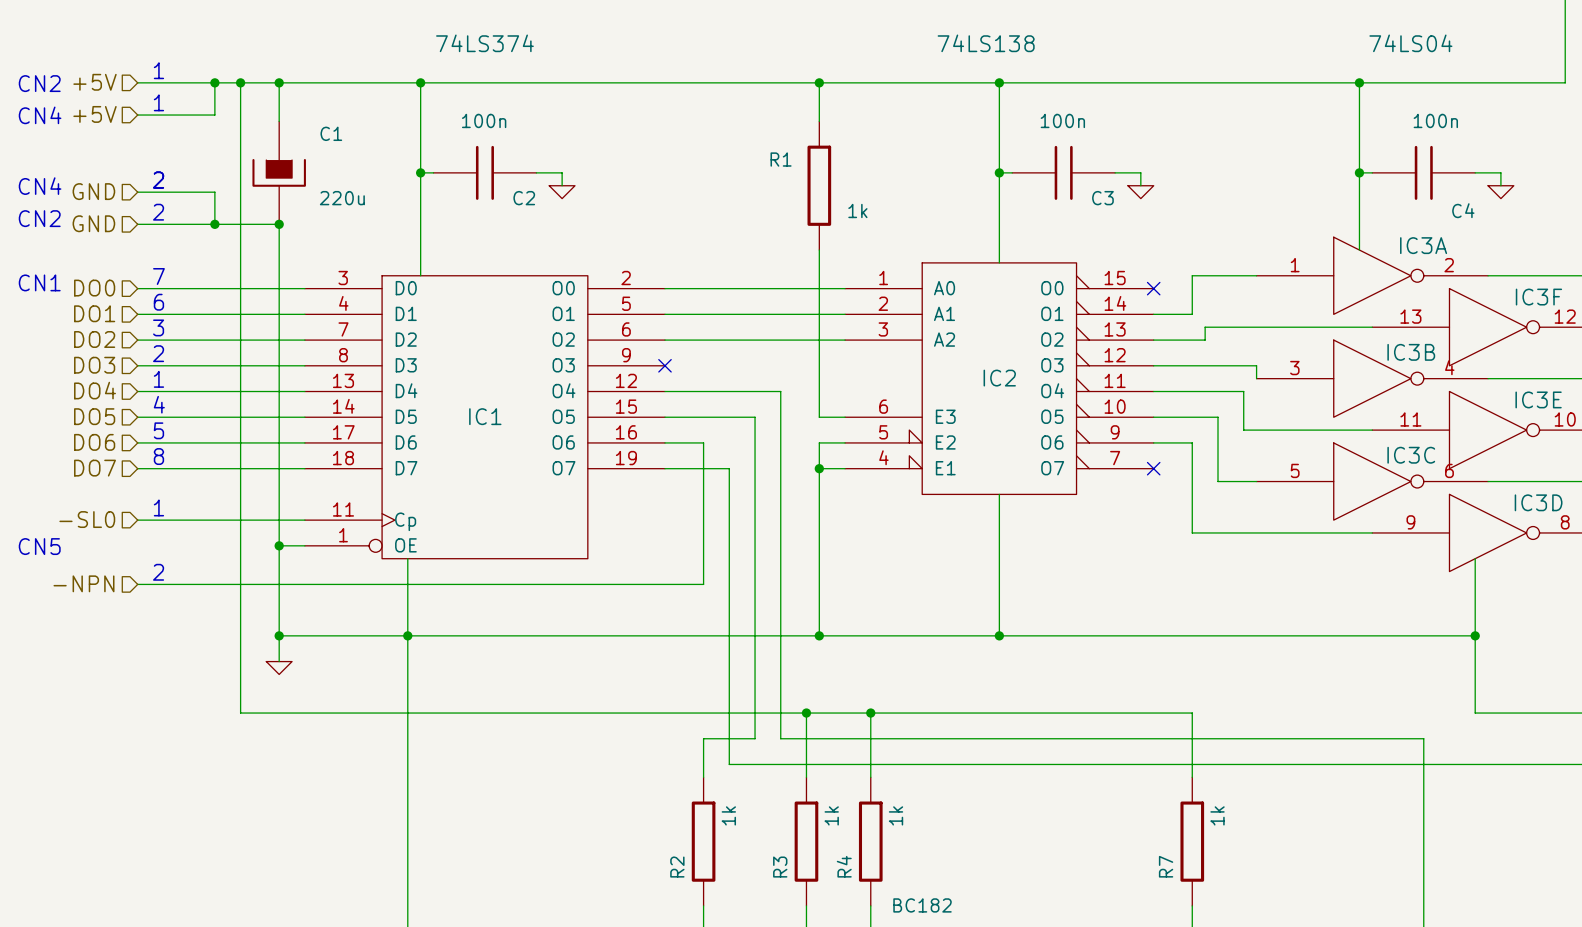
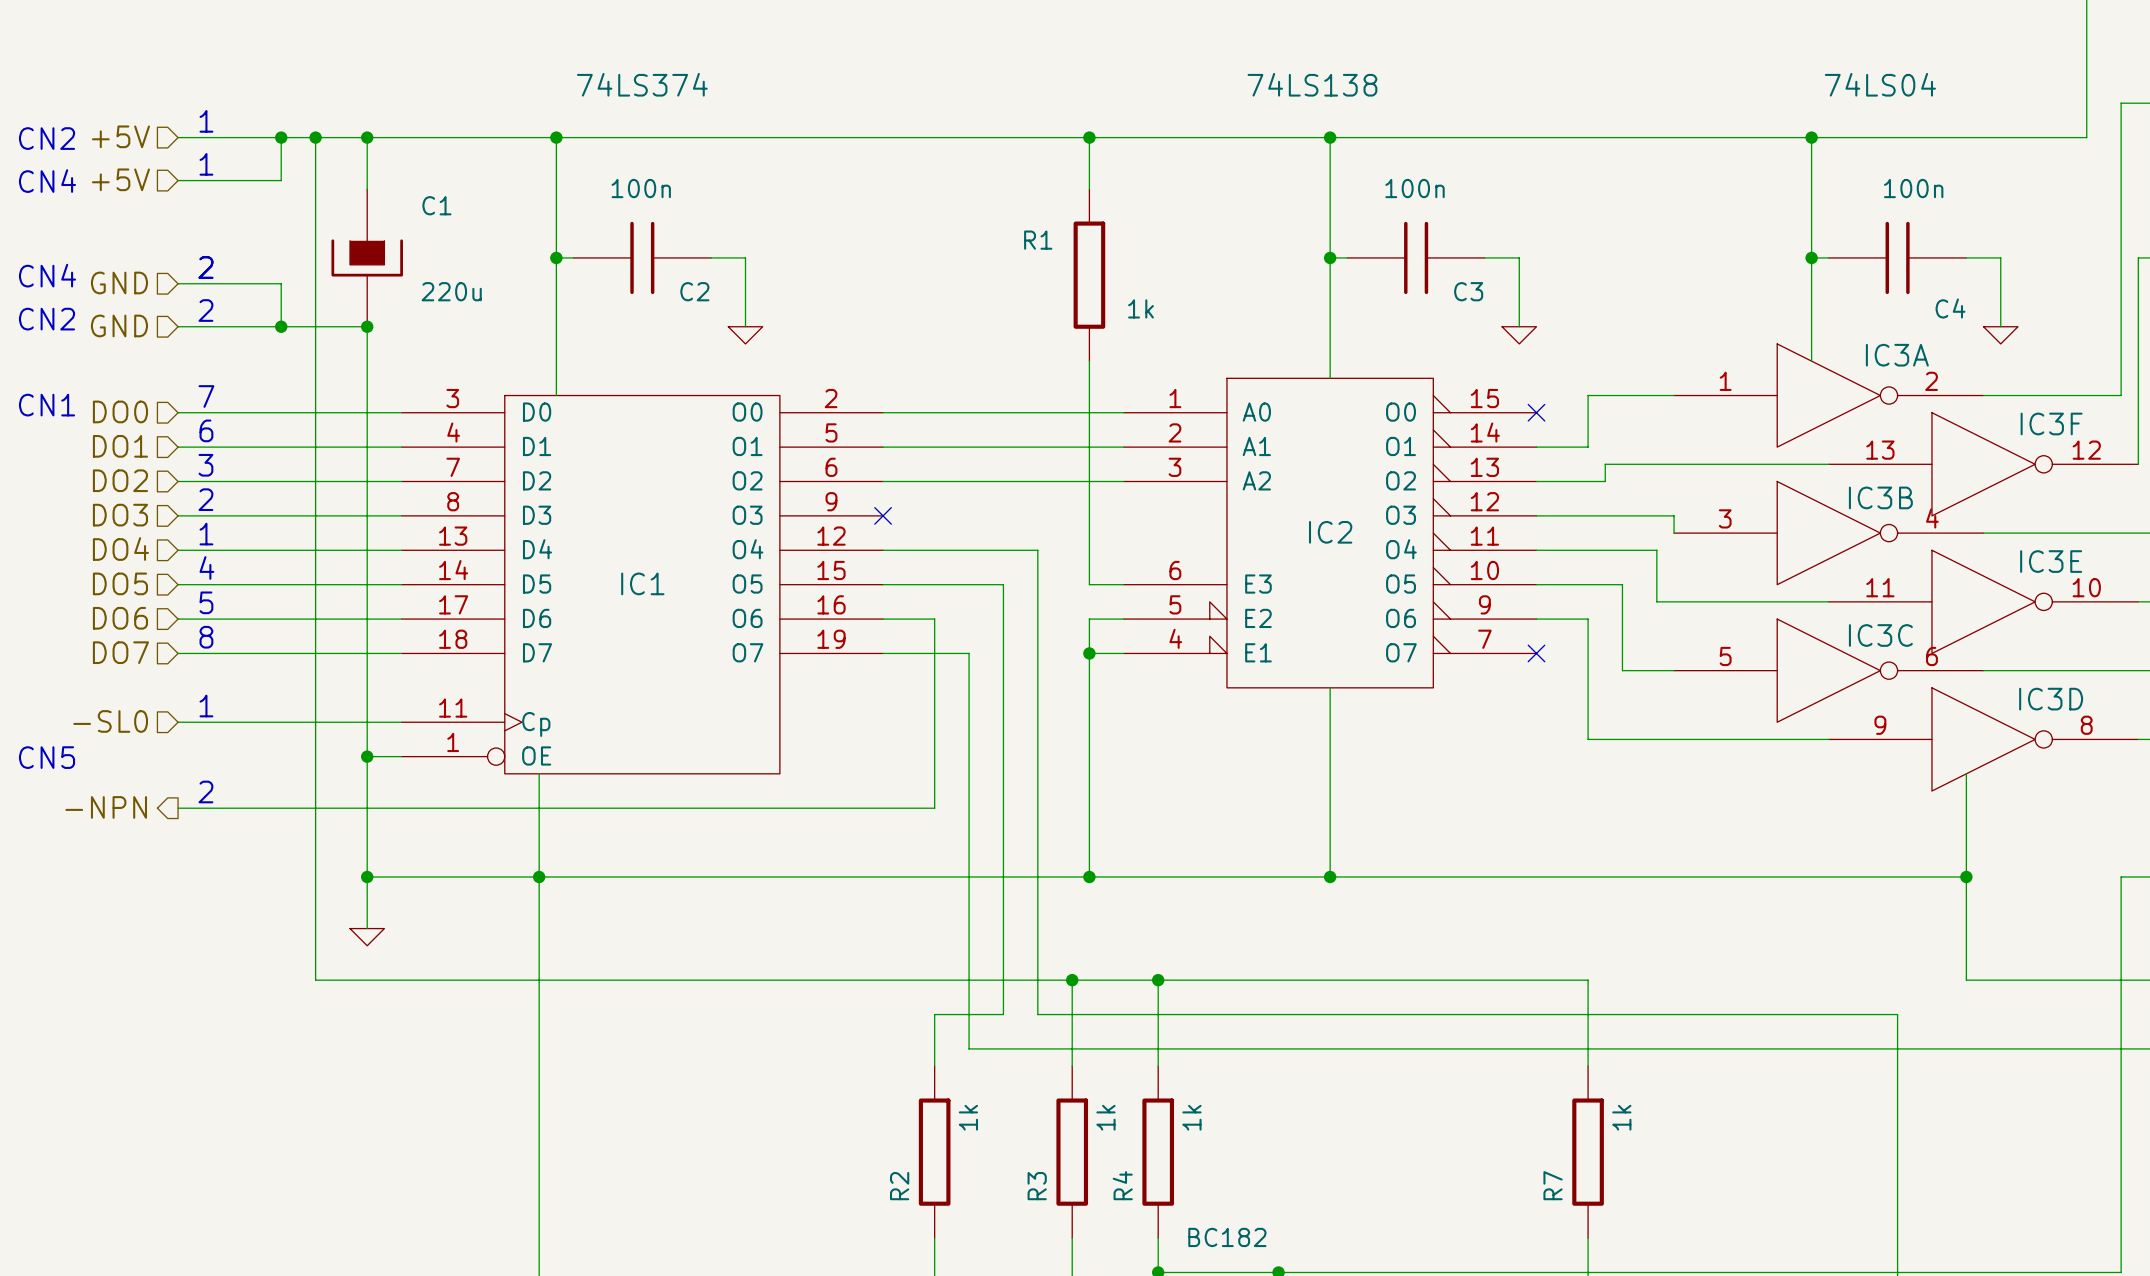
wire: none -> (745, 275) (745, 326)
wire: none -> (1519, 275) (1519, 326)
wire: none -> (2000, 275) (2000, 326)
power symbol position: (562, 192) -> (745, 335)
power symbol position: (1140, 192) -> (1519, 335)
power symbol position: (1500, 192) -> (2000, 335)
hierarchical label shape: input (83, 583) -> output (106, 807)
wire: none -> (367, 911) (367, 928)
power symbol position: (279, 668) -> (367, 937)

